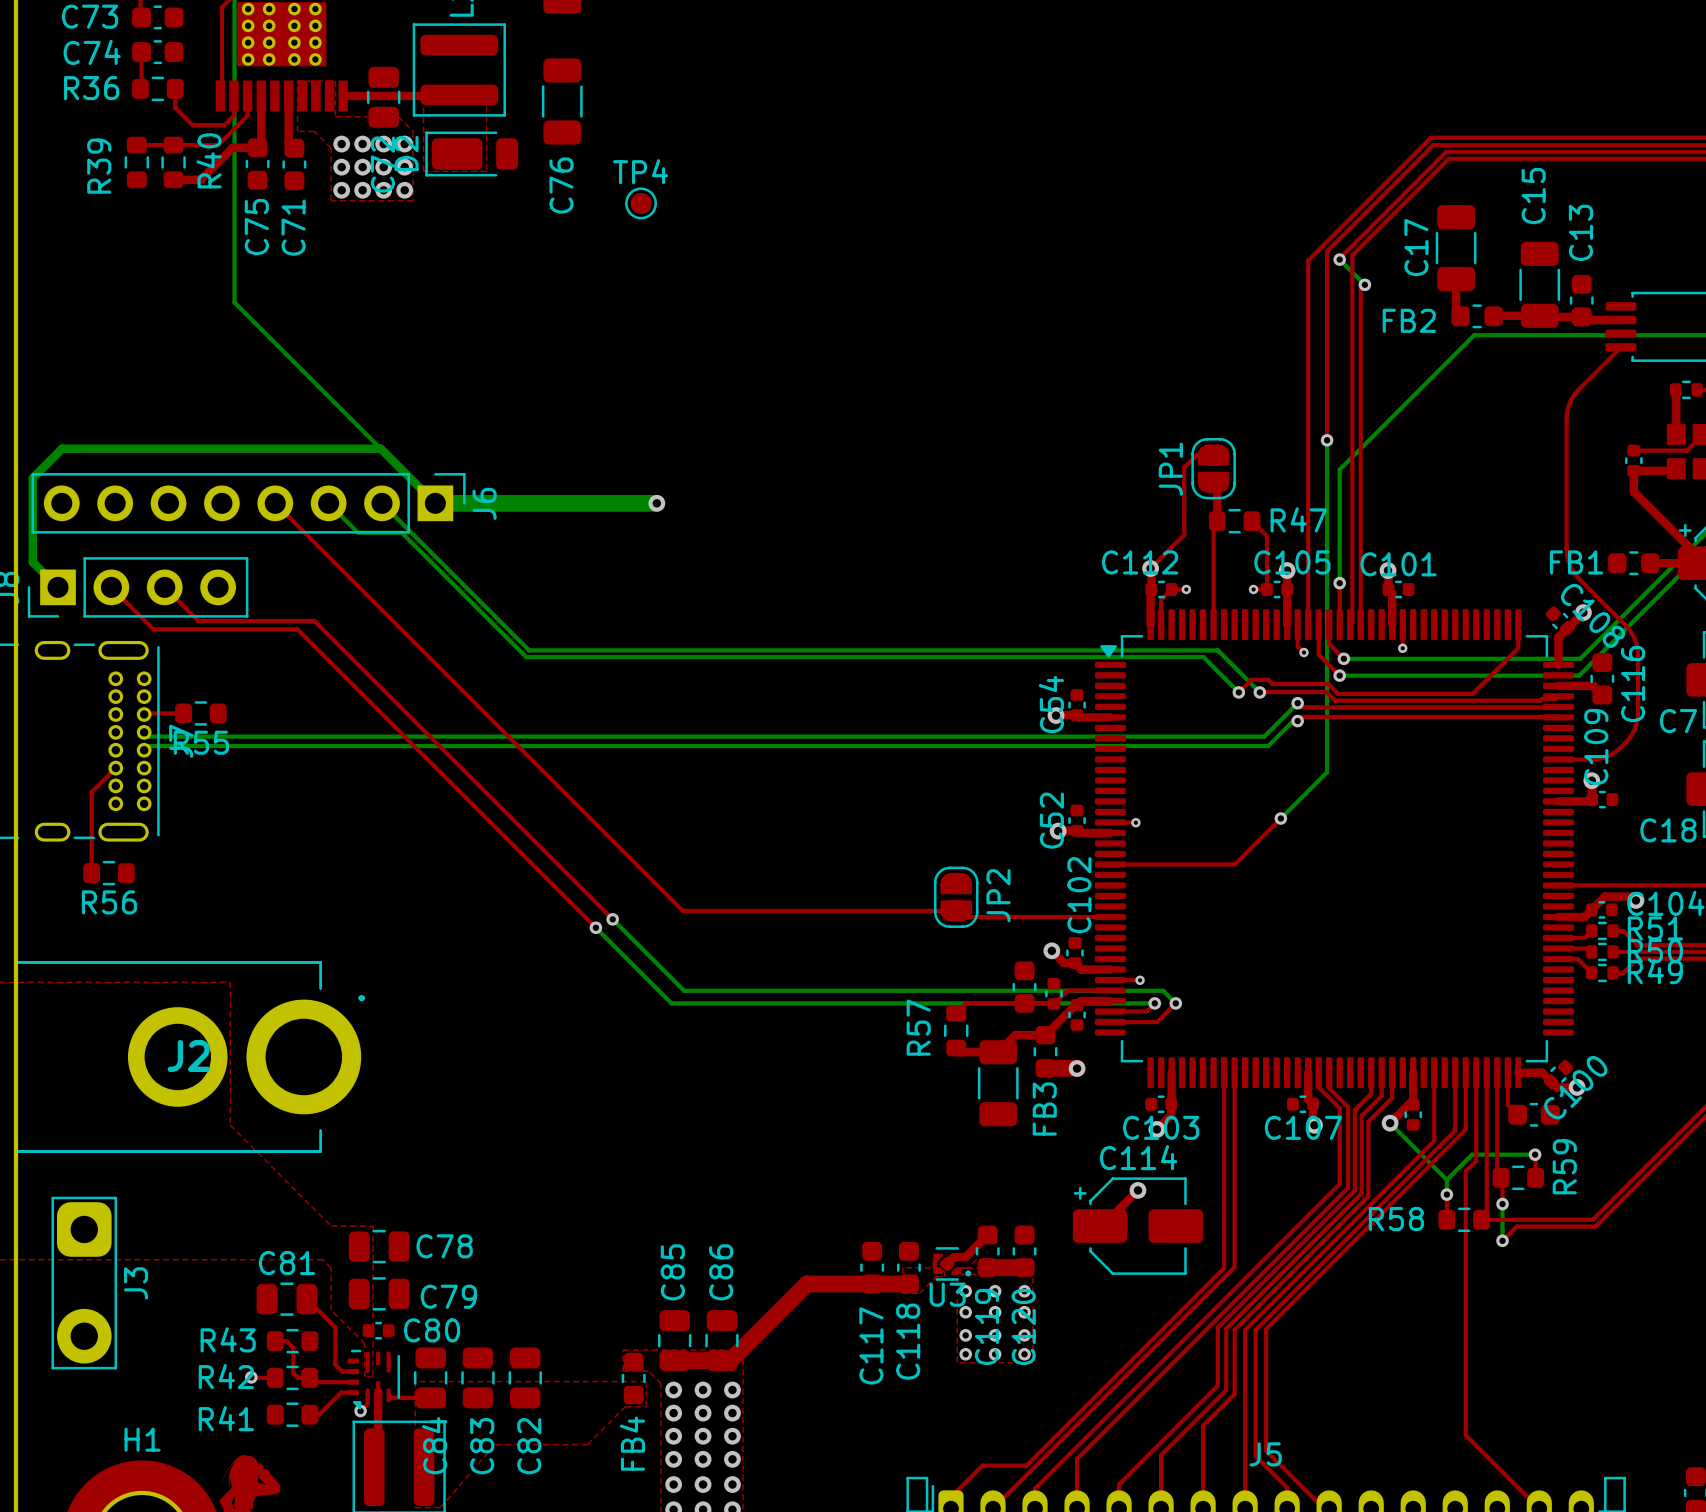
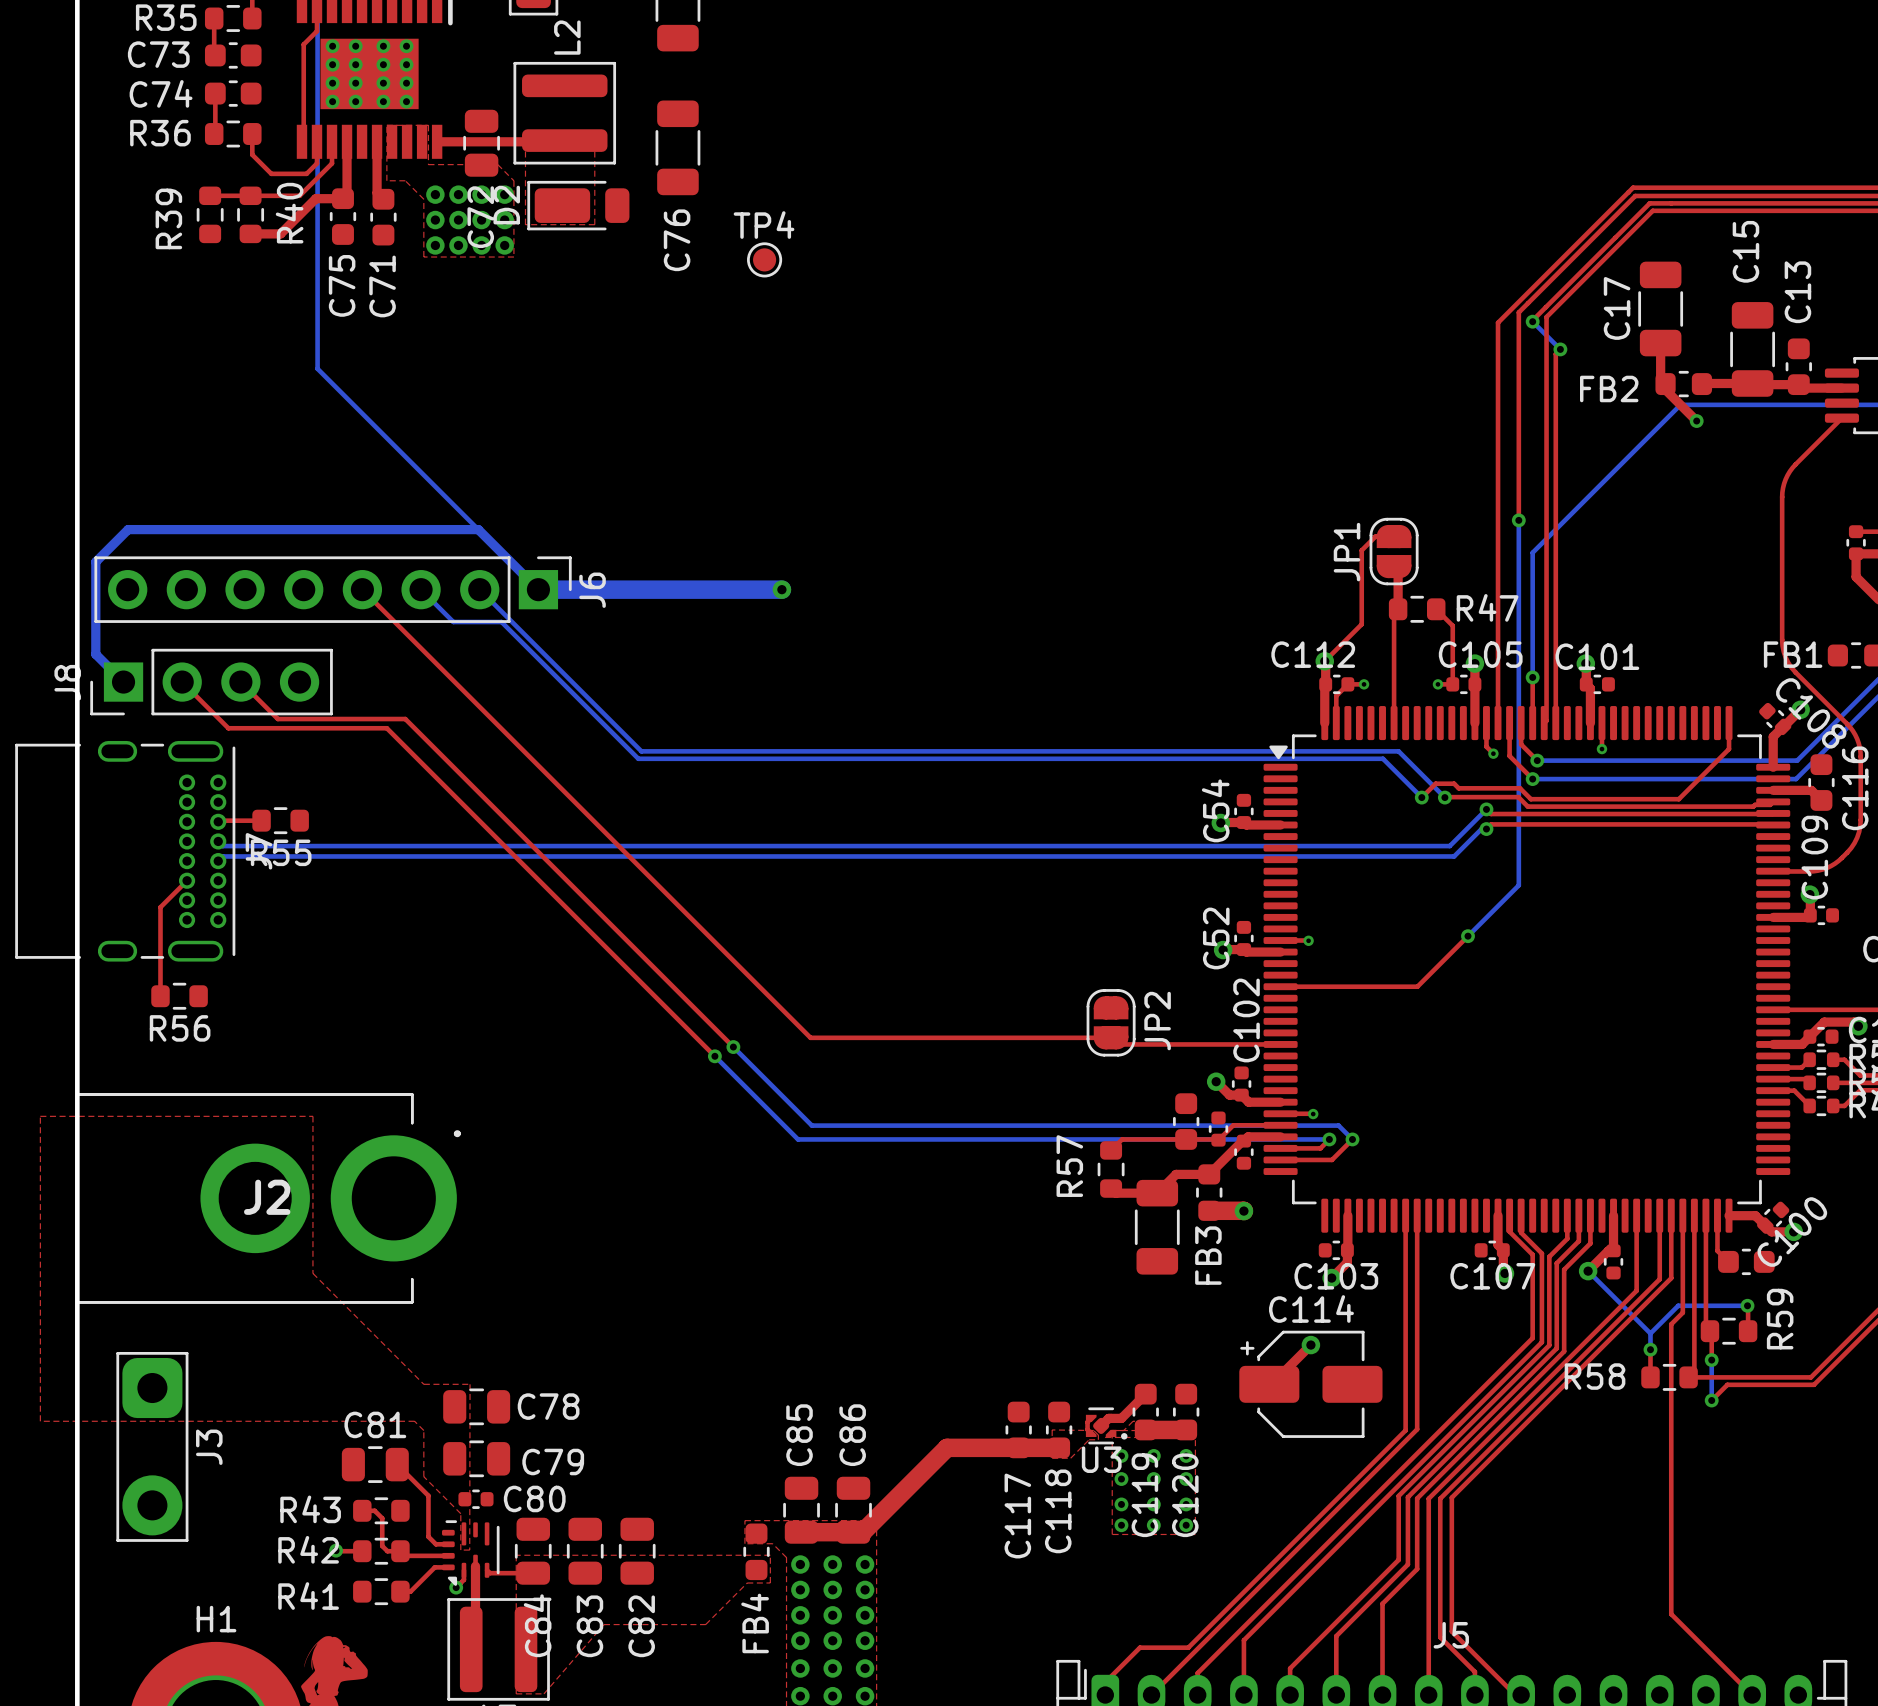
top track: none -> (1665, 384) (1665, 389) (1696, 421)
via: none -> (1696, 421)

